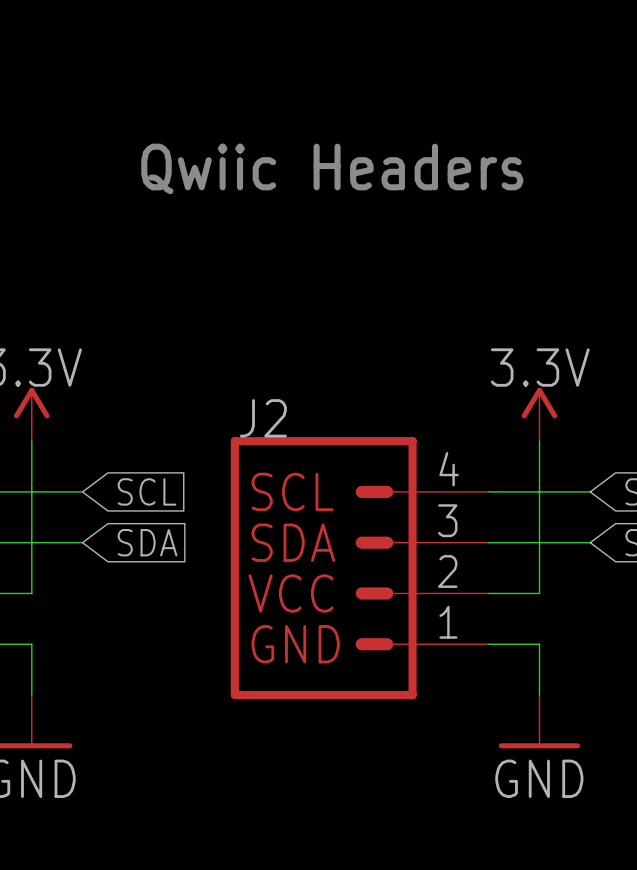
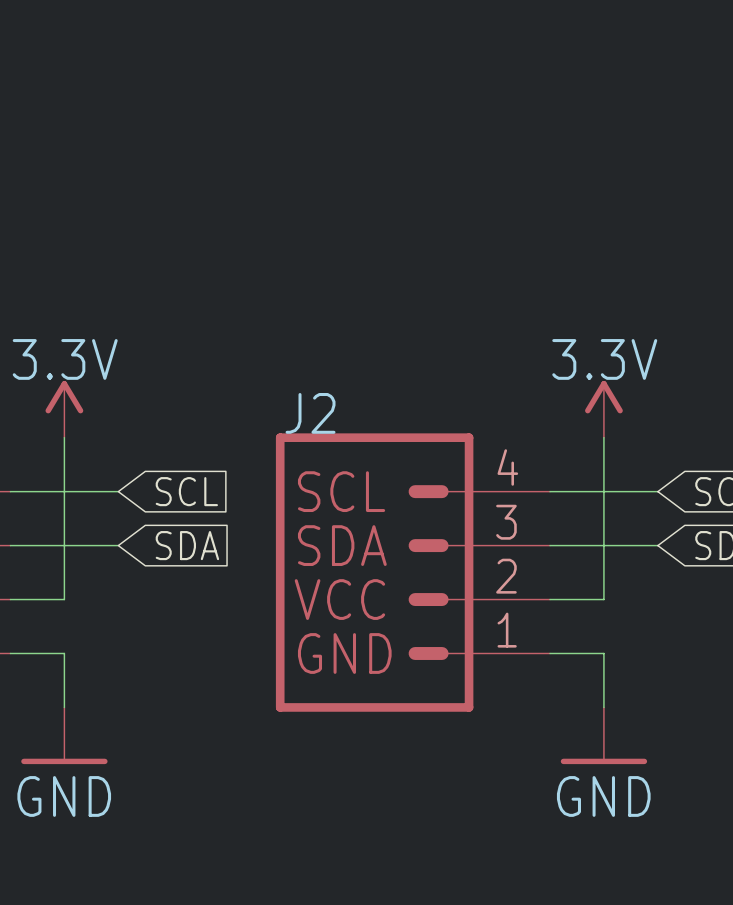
text: Qwiic Headers (332, 168) -> none

